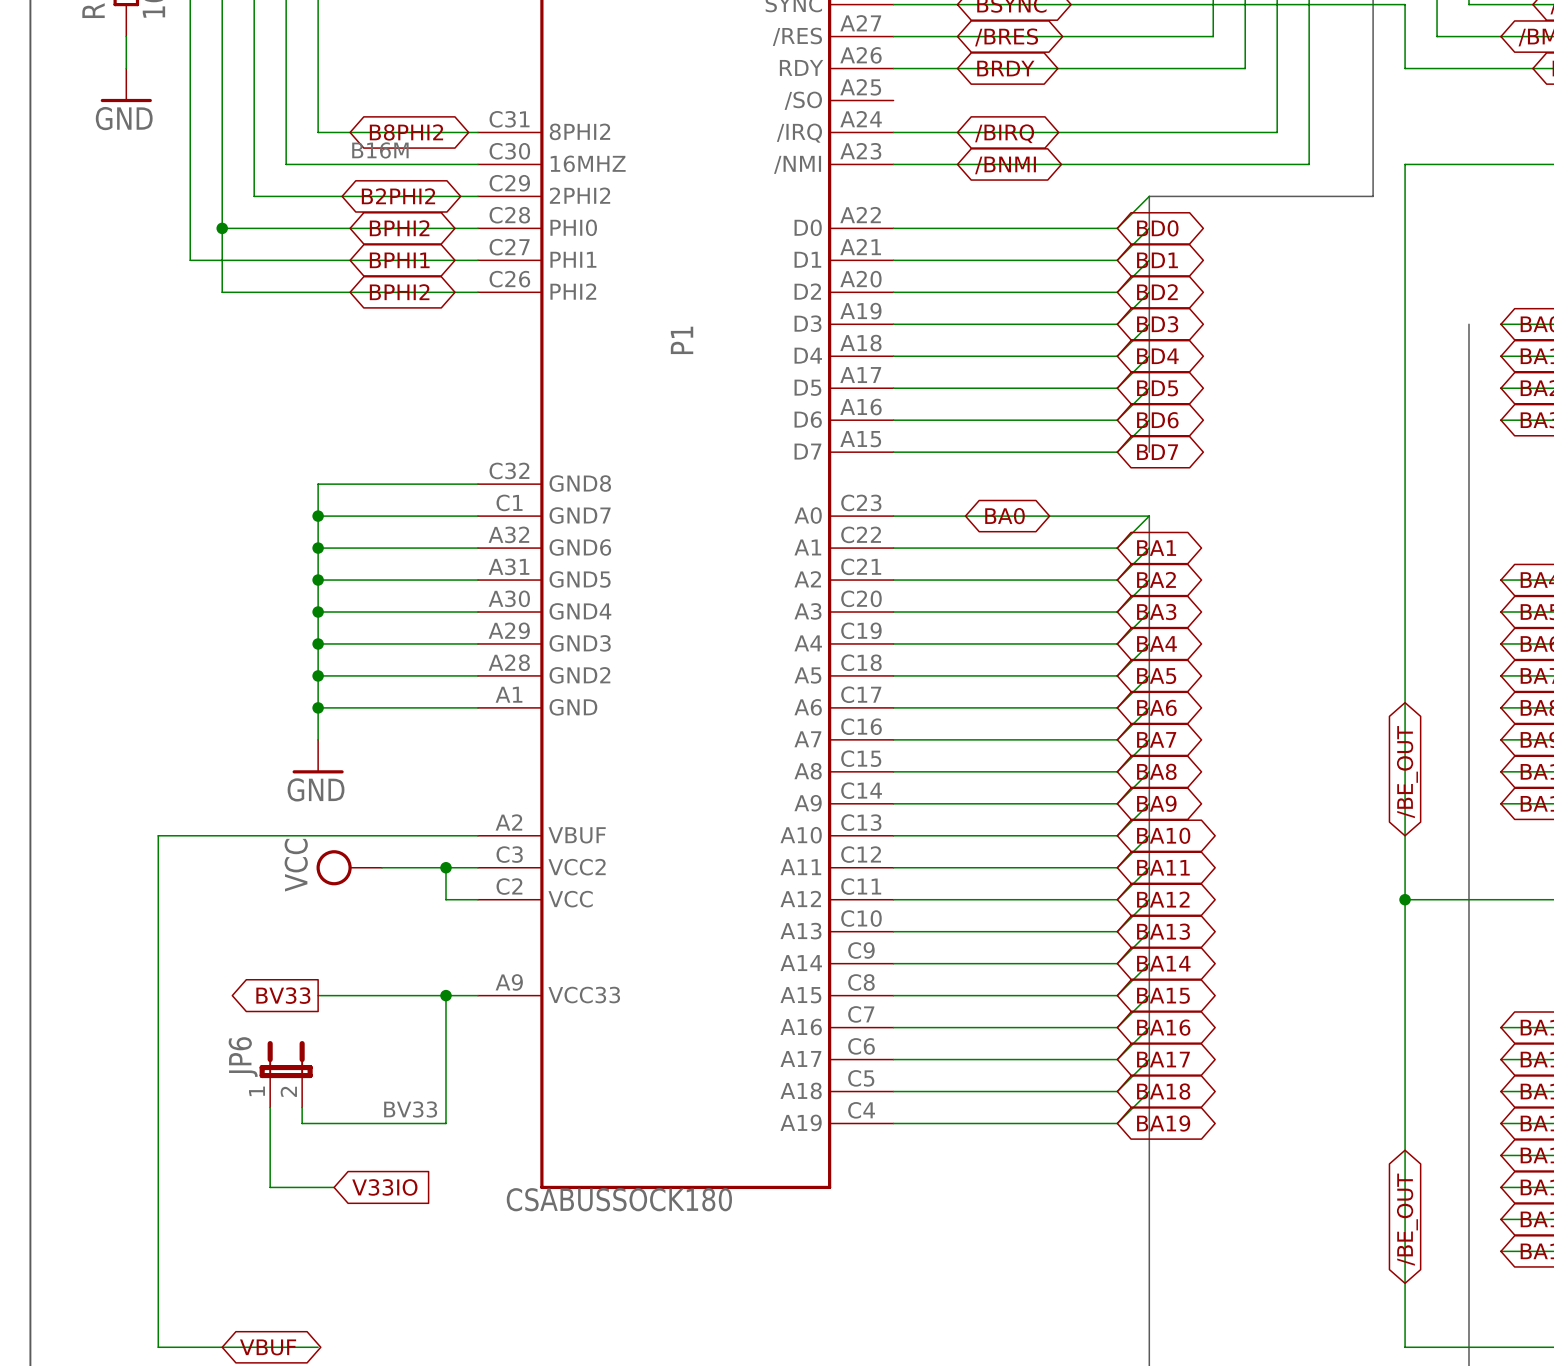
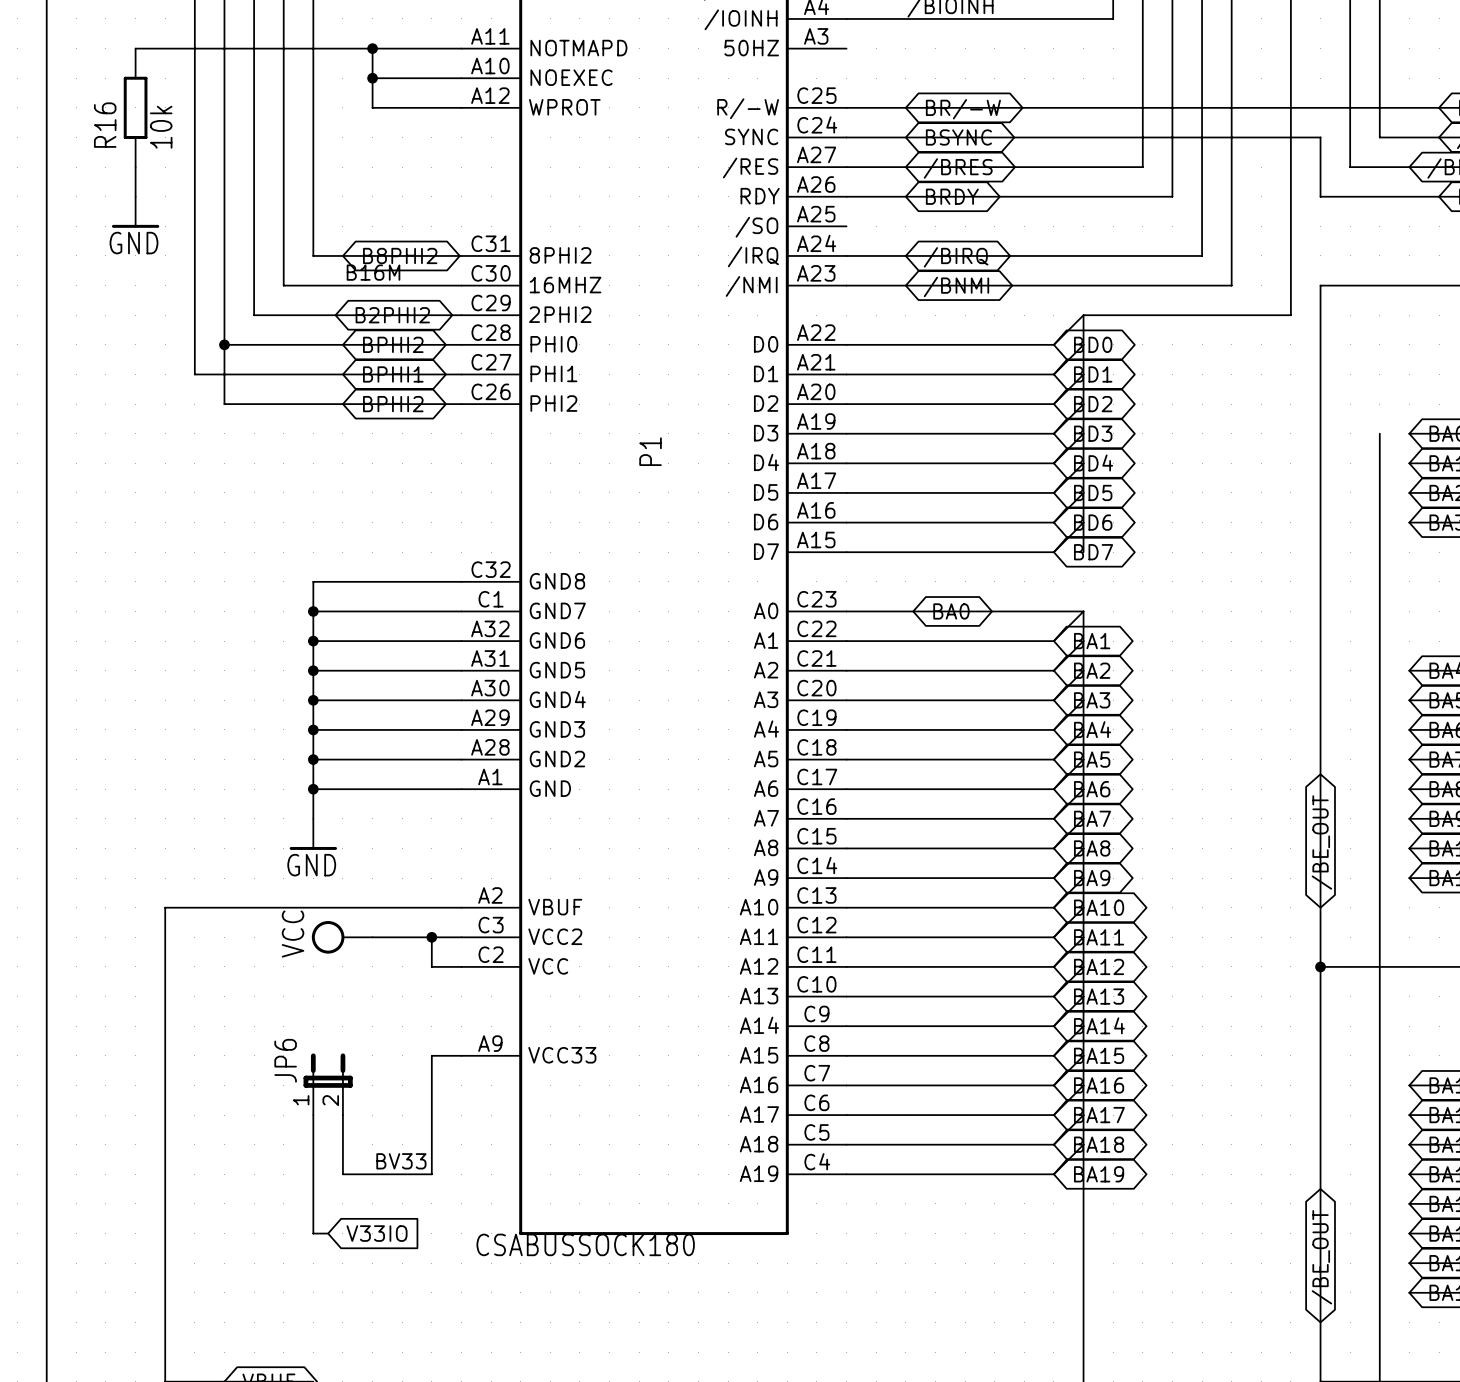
global label: BV33 (283, 995) -> none
wire: (318, 995) (446, 995) -> none
junction: (446, 995) -> none
JP6 position: (286, 1074) -> (328, 1084)
wire: (270, 1107) (270, 1187) (318, 1187) -> (313, 1115) (313, 1233)
wire: (302, 1107) (302, 1123) (350, 1123) -> (342, 1115) (342, 1174)

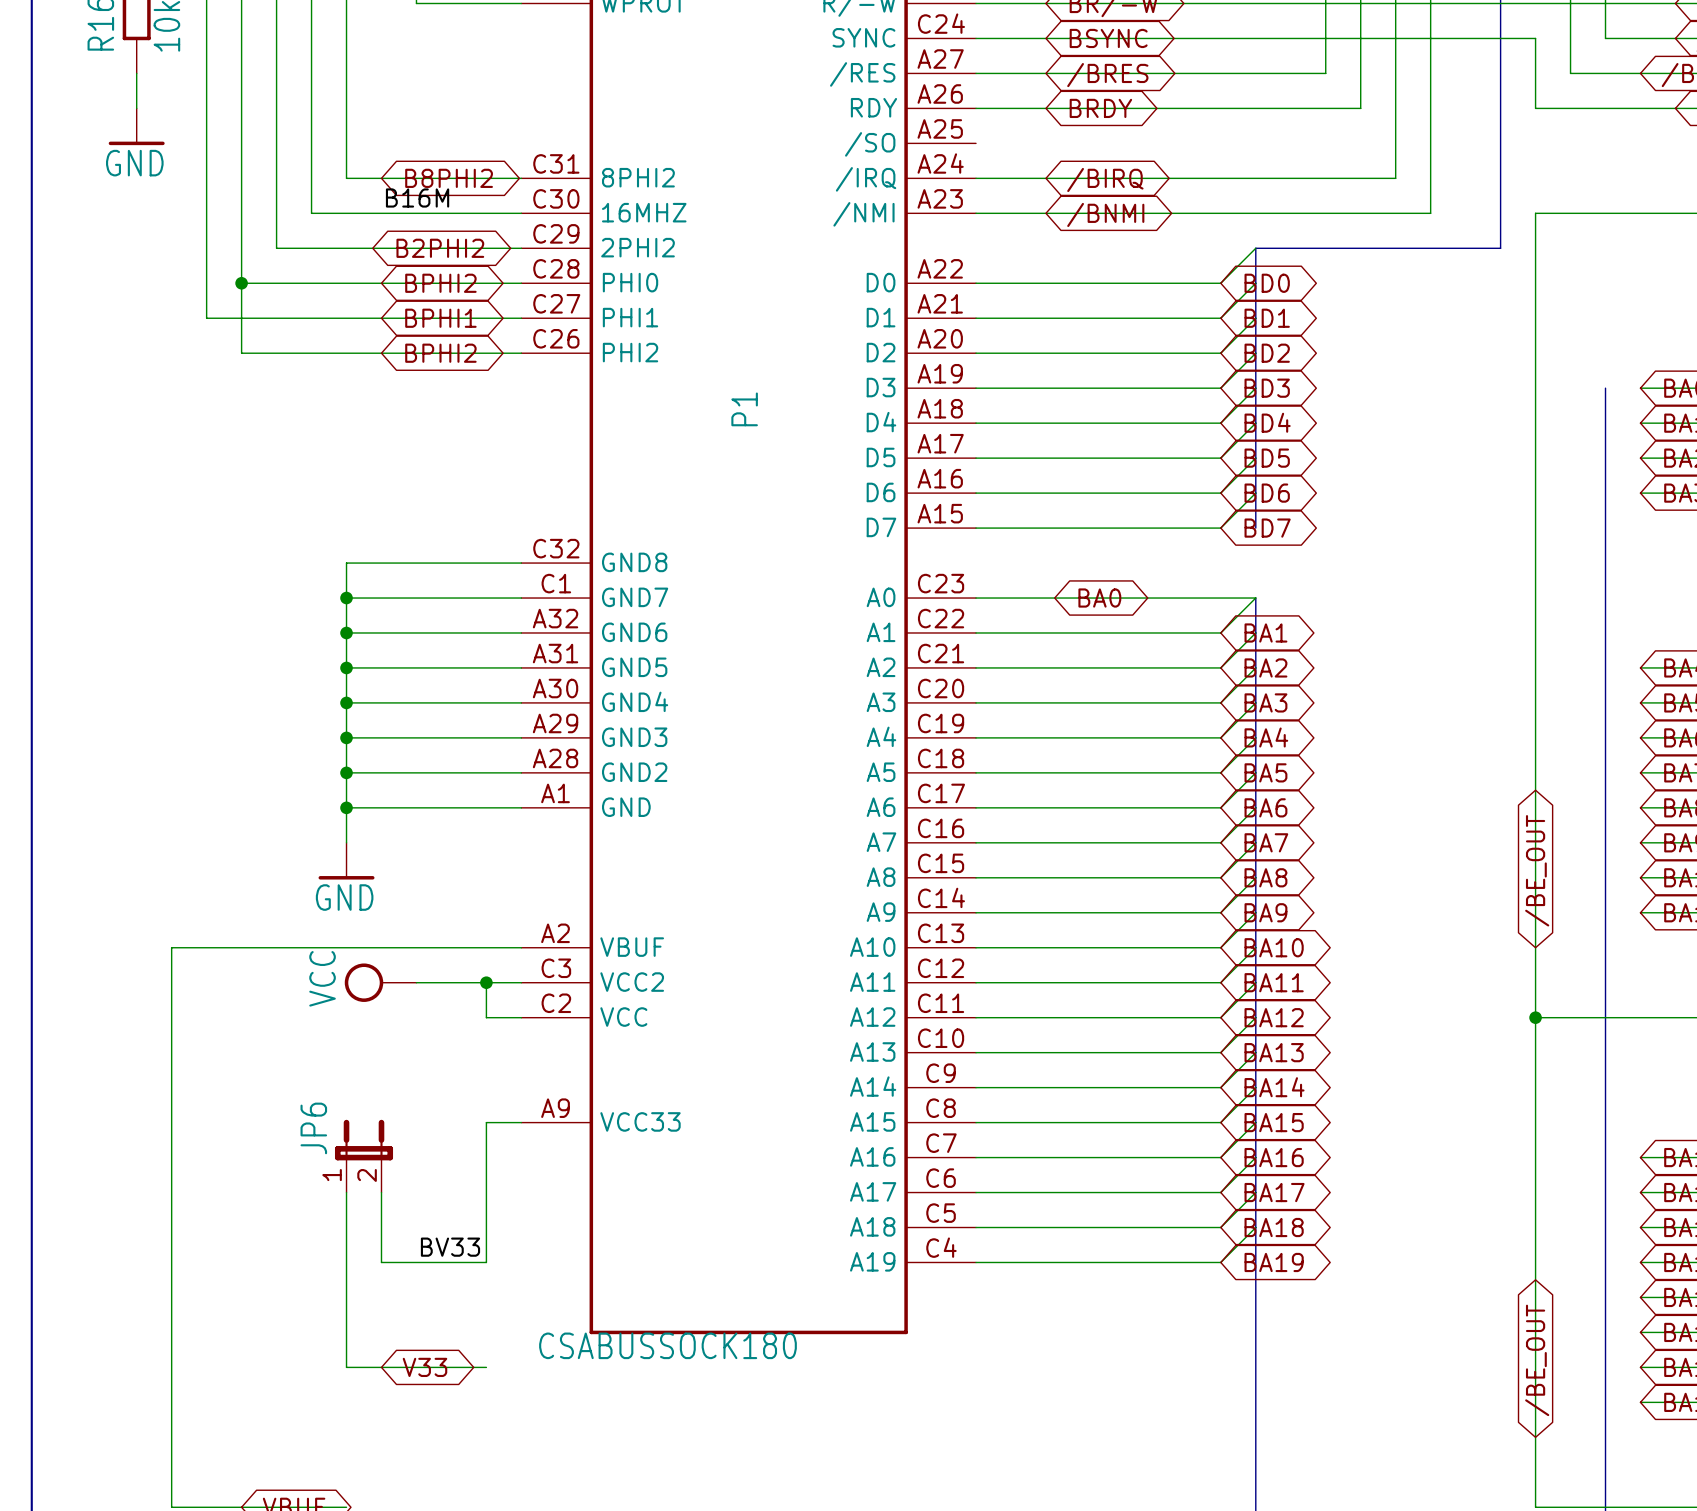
wire: (313, 1233) (328, 1233) -> (346, 1332) (346, 1367) (486, 1367)
global label shape: input (377, 1233) -> bidirectional (425, 1367)
global label: V33IO (377, 1233) -> V33 (425, 1367)

